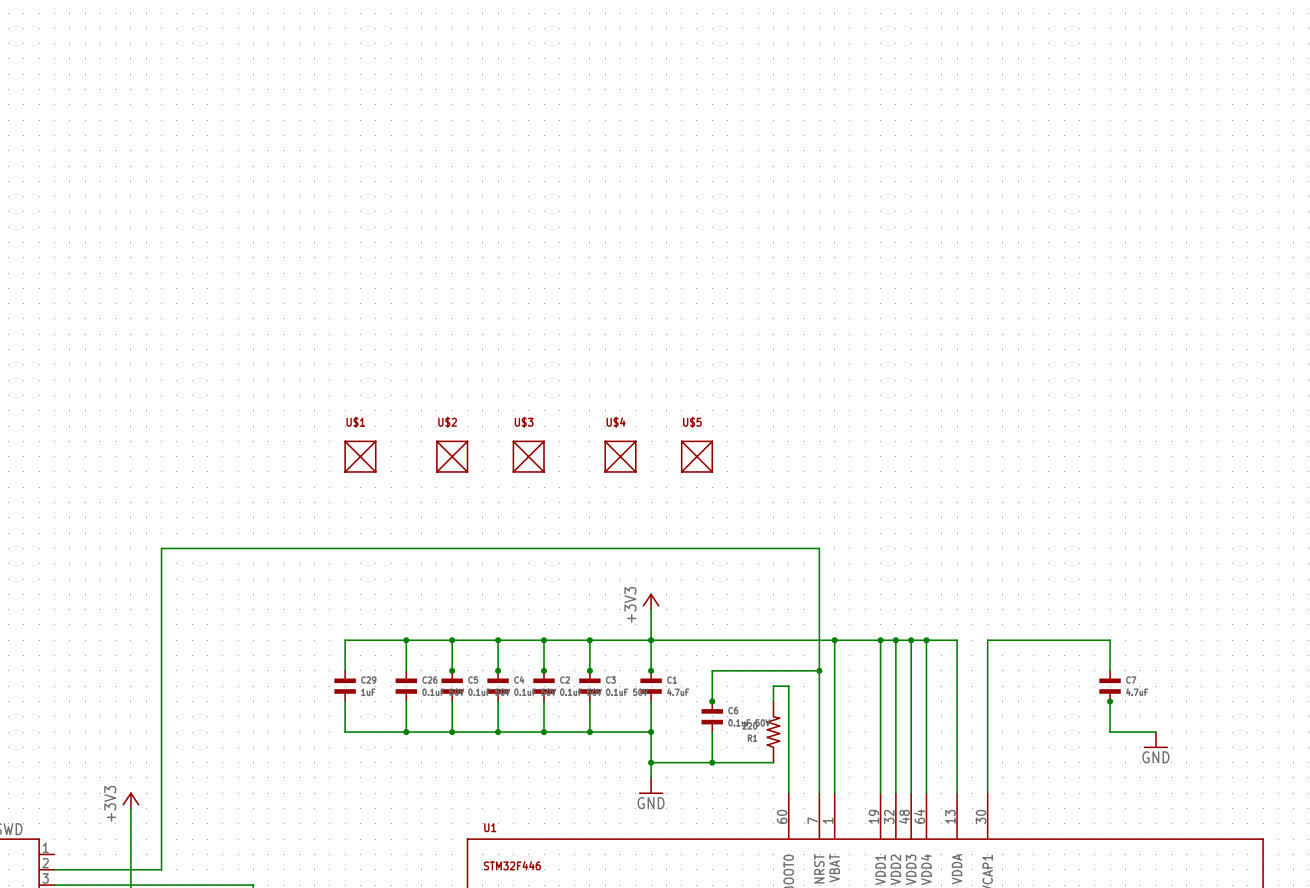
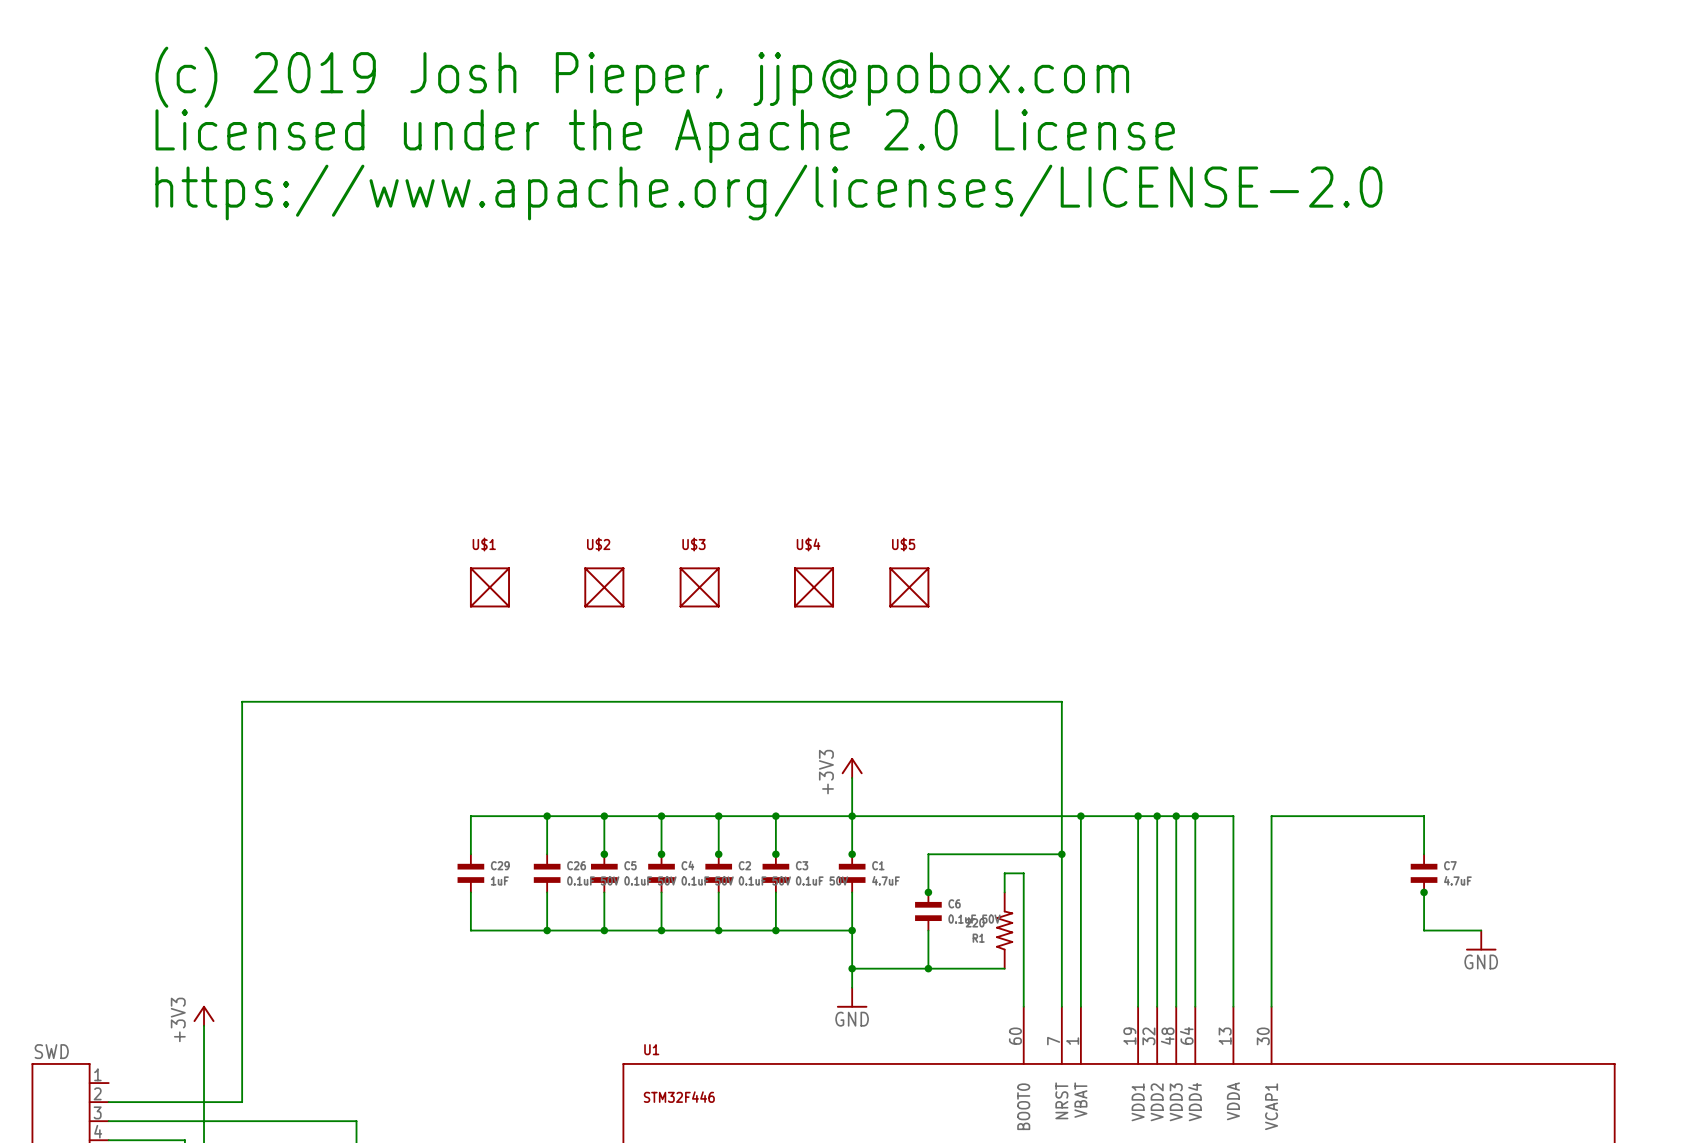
text: none -> (c) 2019 Josh Pieper, jjp@pobox.com (642, 77)
text: none -> Licensed under the Apache 2.0 License (665, 136)
text: none -> https://www.apache.org/licenses/LICENSE-2.0 (768, 192)

